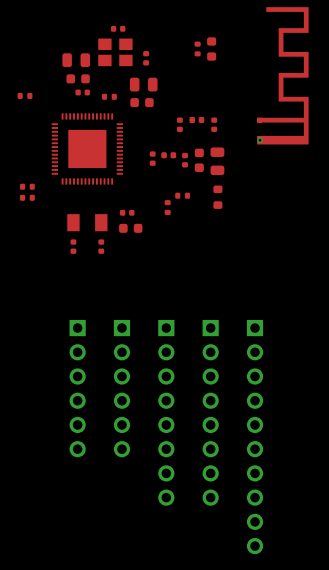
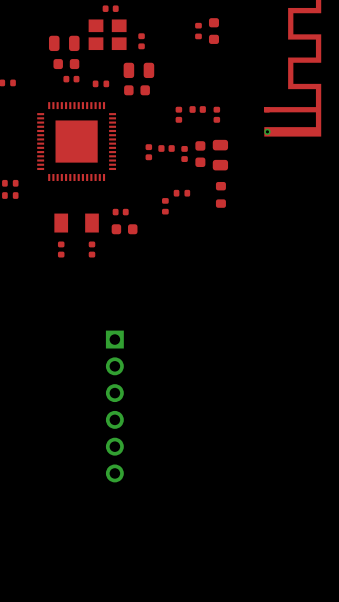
part: (77, 388) -> none
part: (166, 412) -> none
part: (210, 412) -> none
part: (255, 437) -> none

